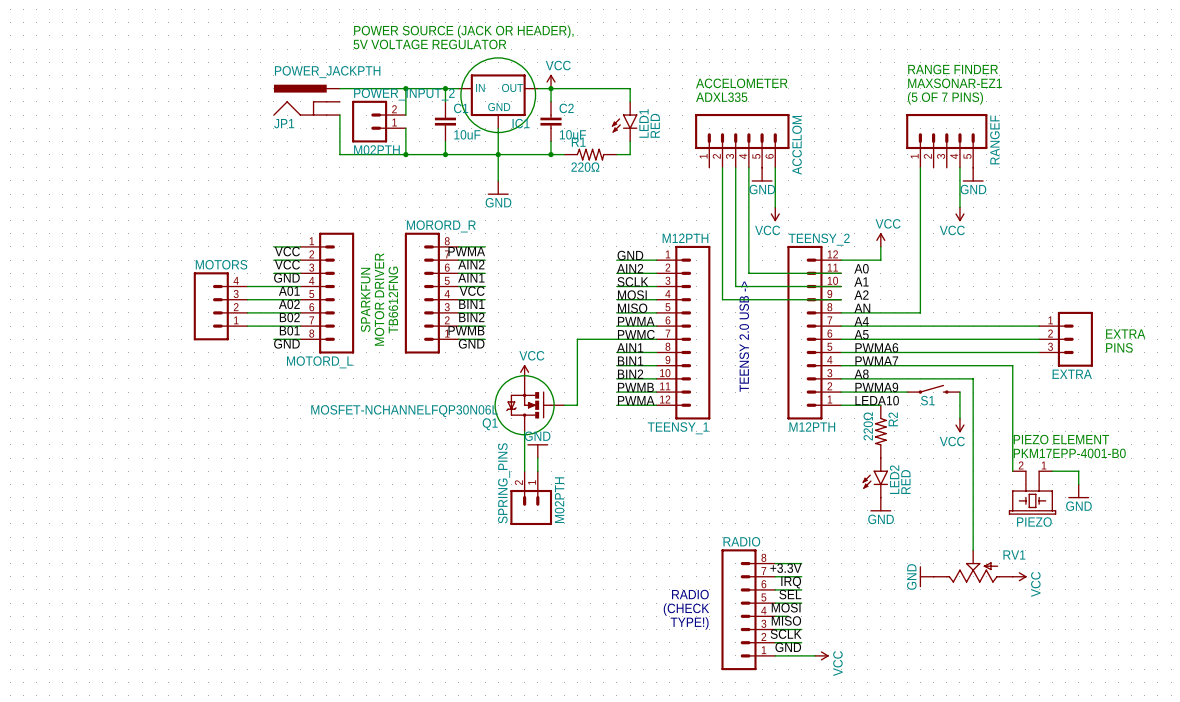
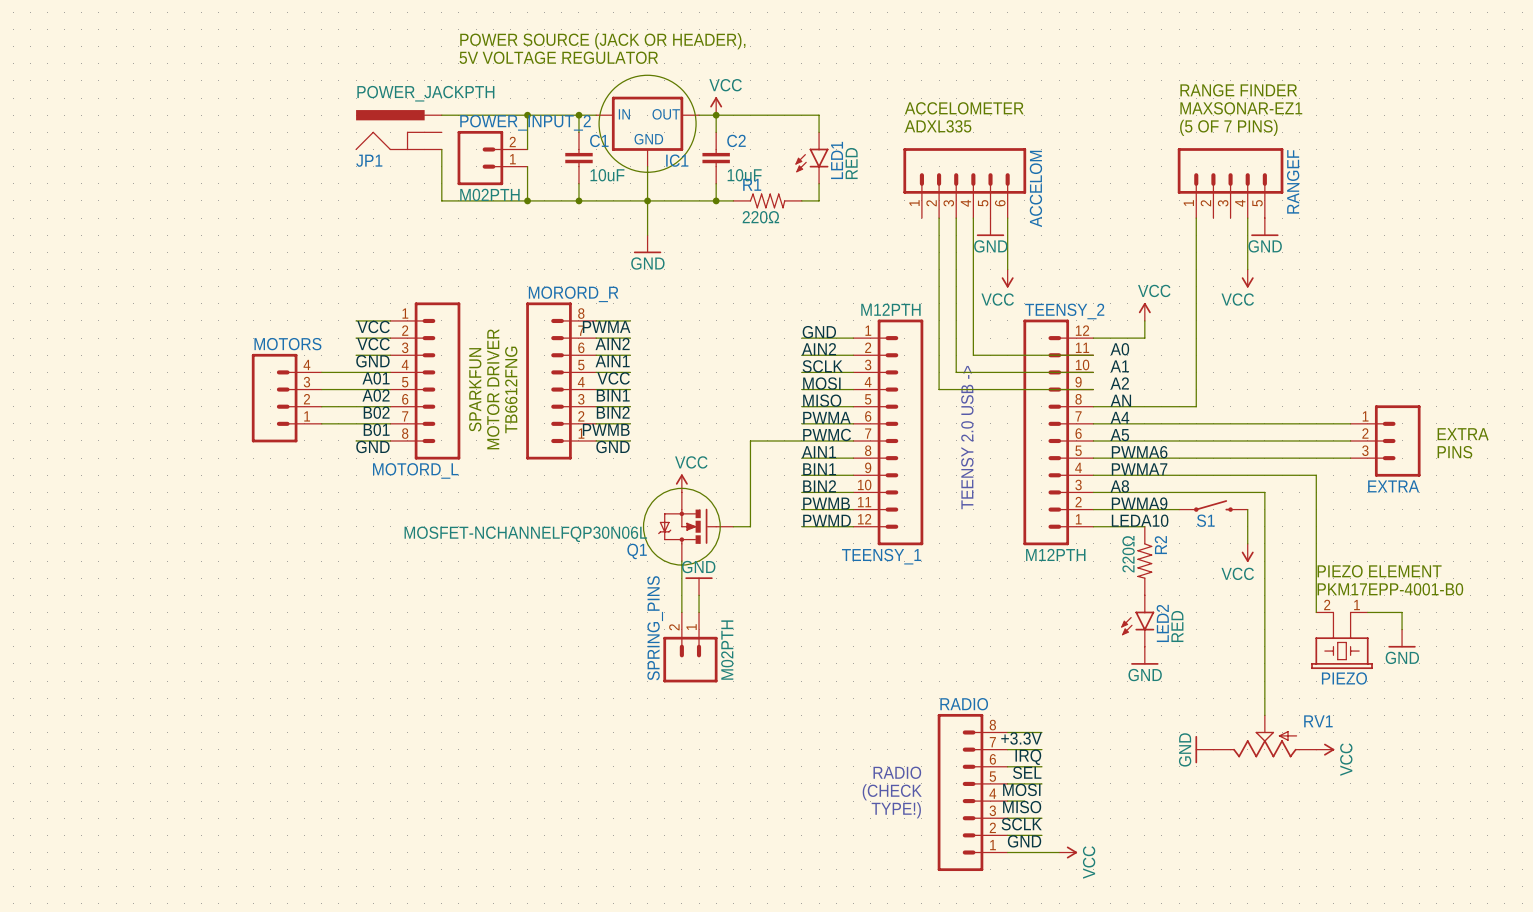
label: PWMA (636, 400) -> PWMD (827, 520)

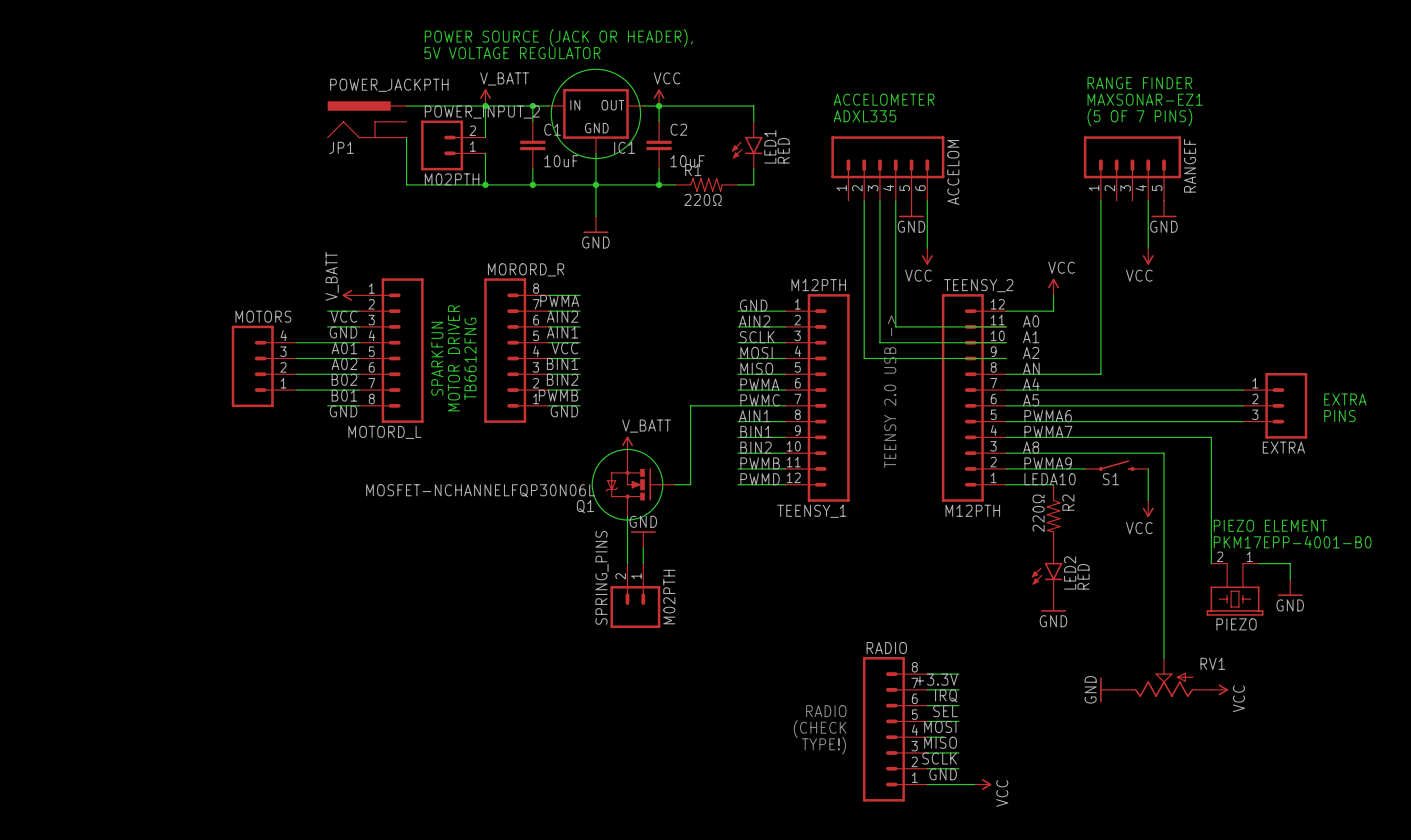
power symbol: none -> V_BATT (485, 97)
power symbol: none -> V_BATT (350, 295)
label: VCC (373, 326) -> none
power symbol: VCC (681, 483) -> V_BATT (627, 444)

